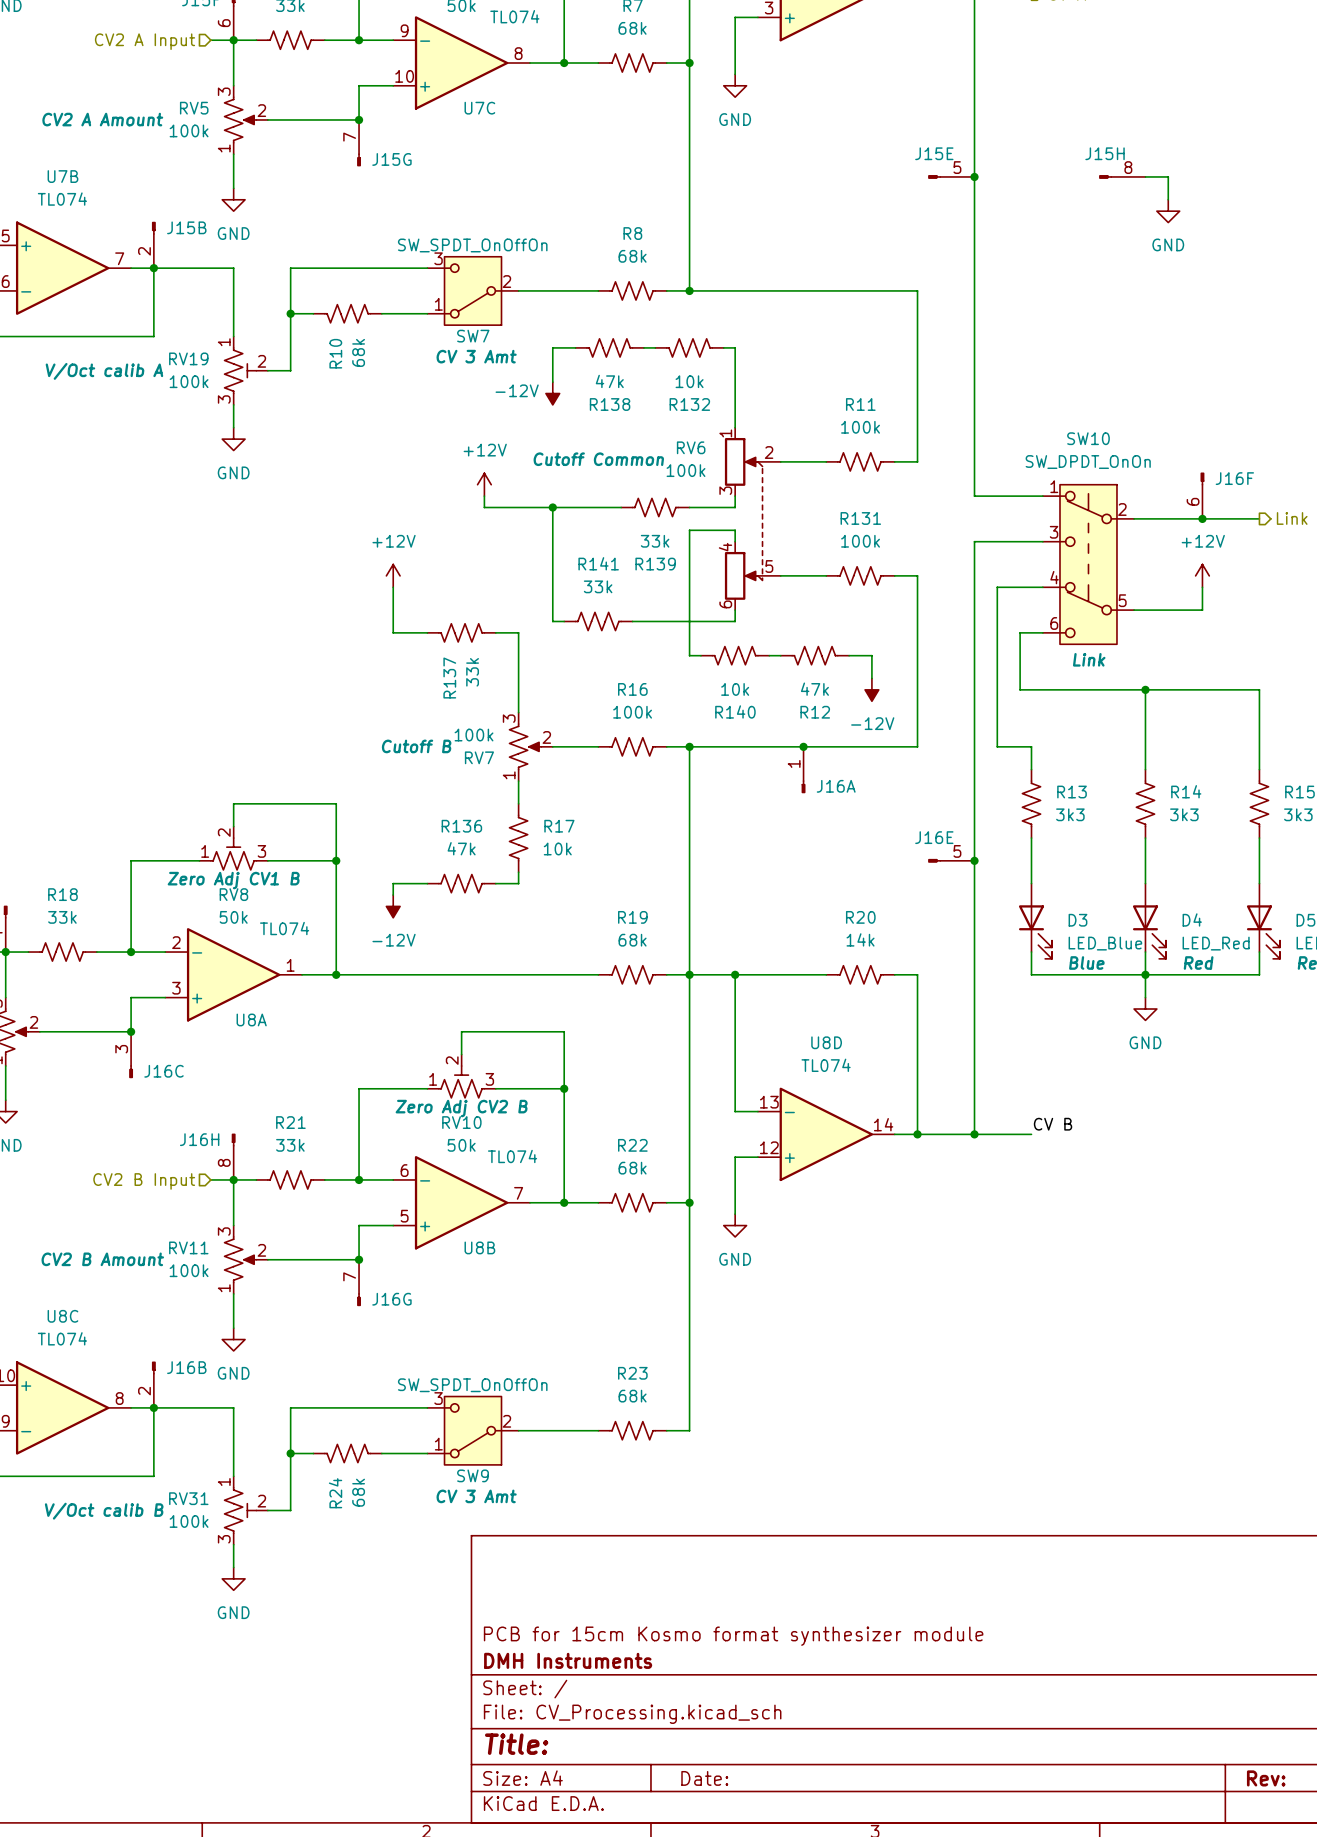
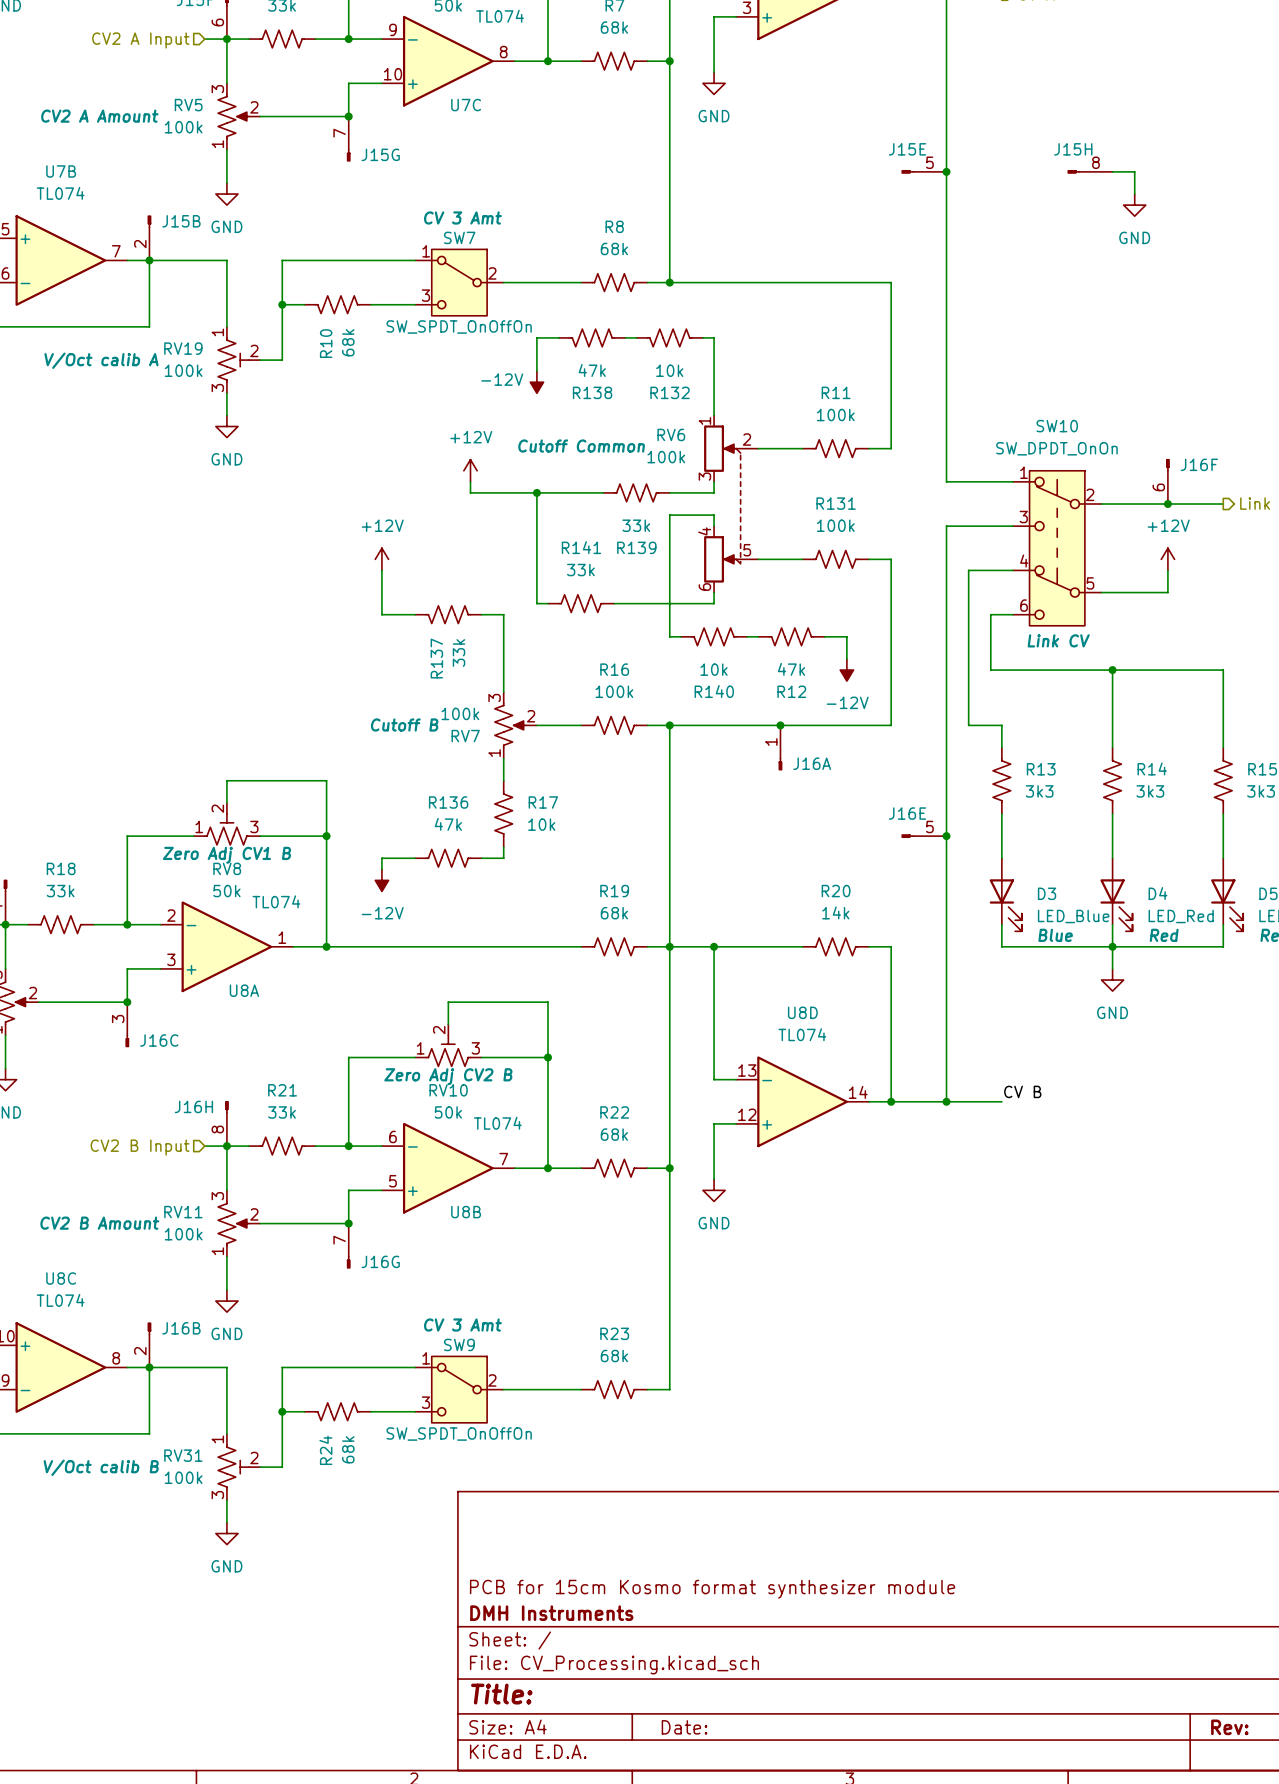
SW7 flip: as is (473, 290) -> up-down (459, 282)
SW10 text: Link (1089, 659) -> Link CV (1058, 640)
SW9 flip: as is (473, 1430) -> up-down (459, 1389)

